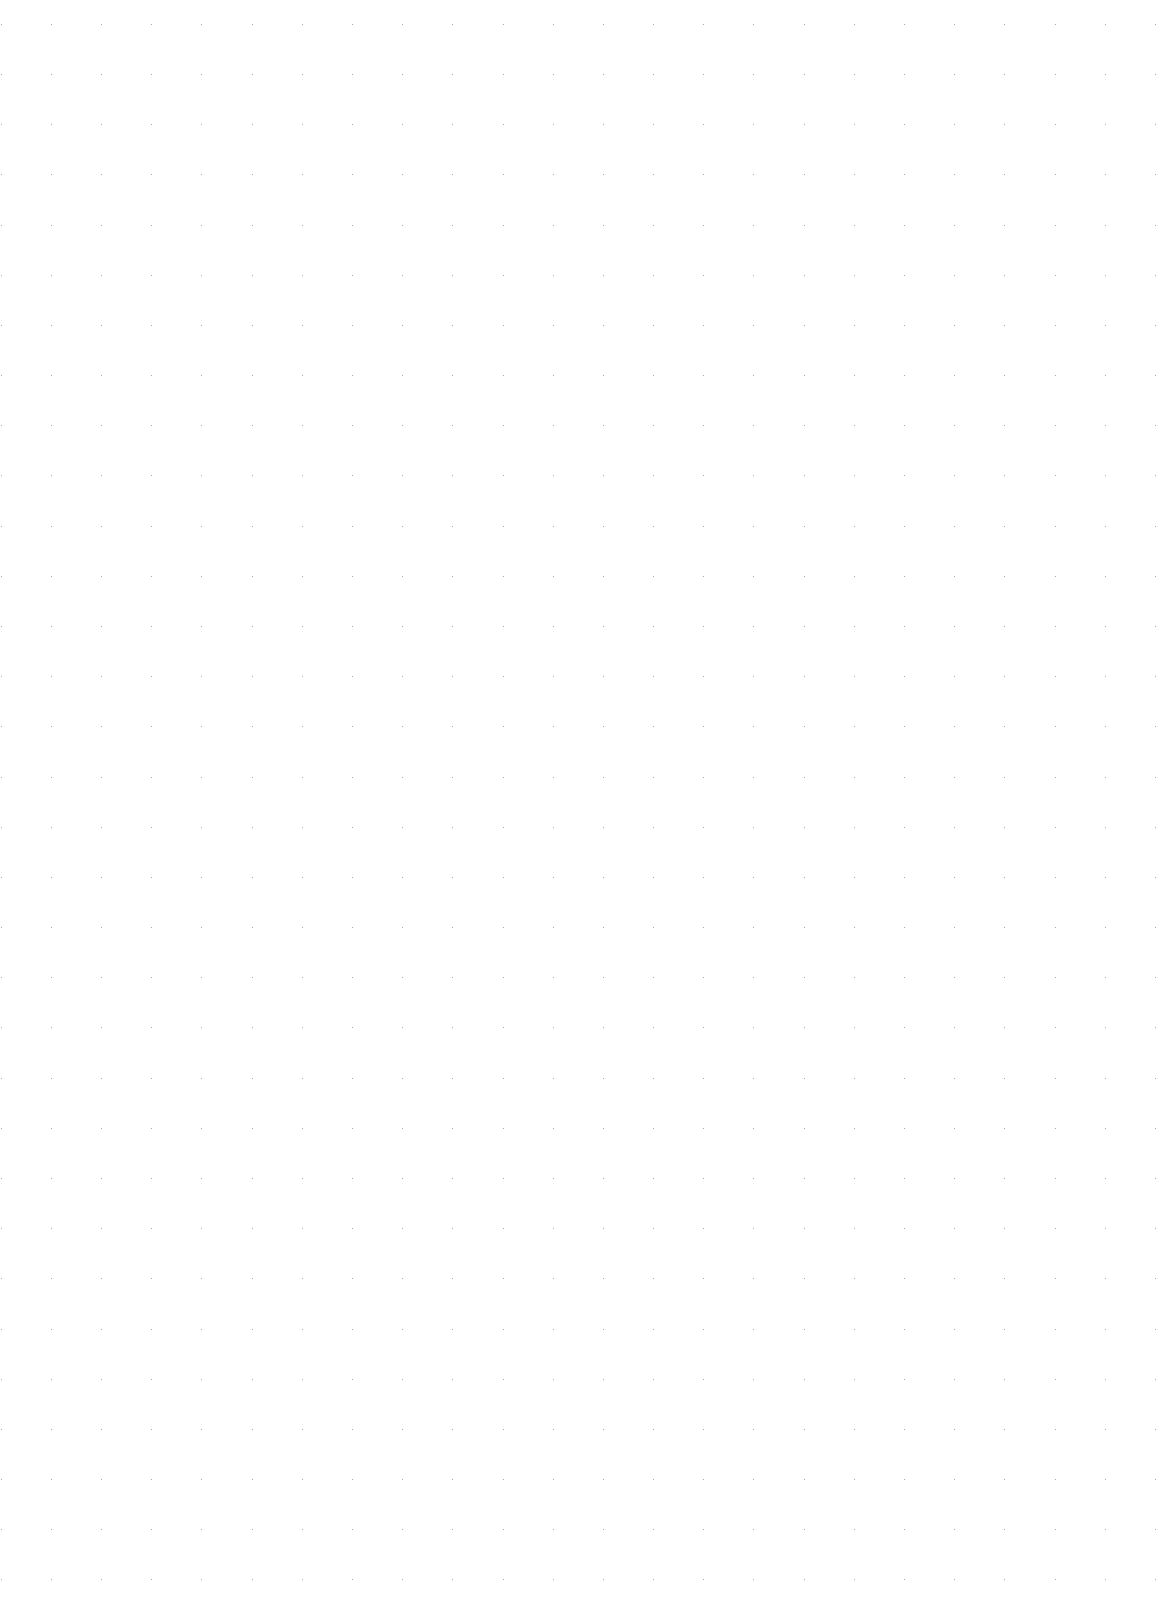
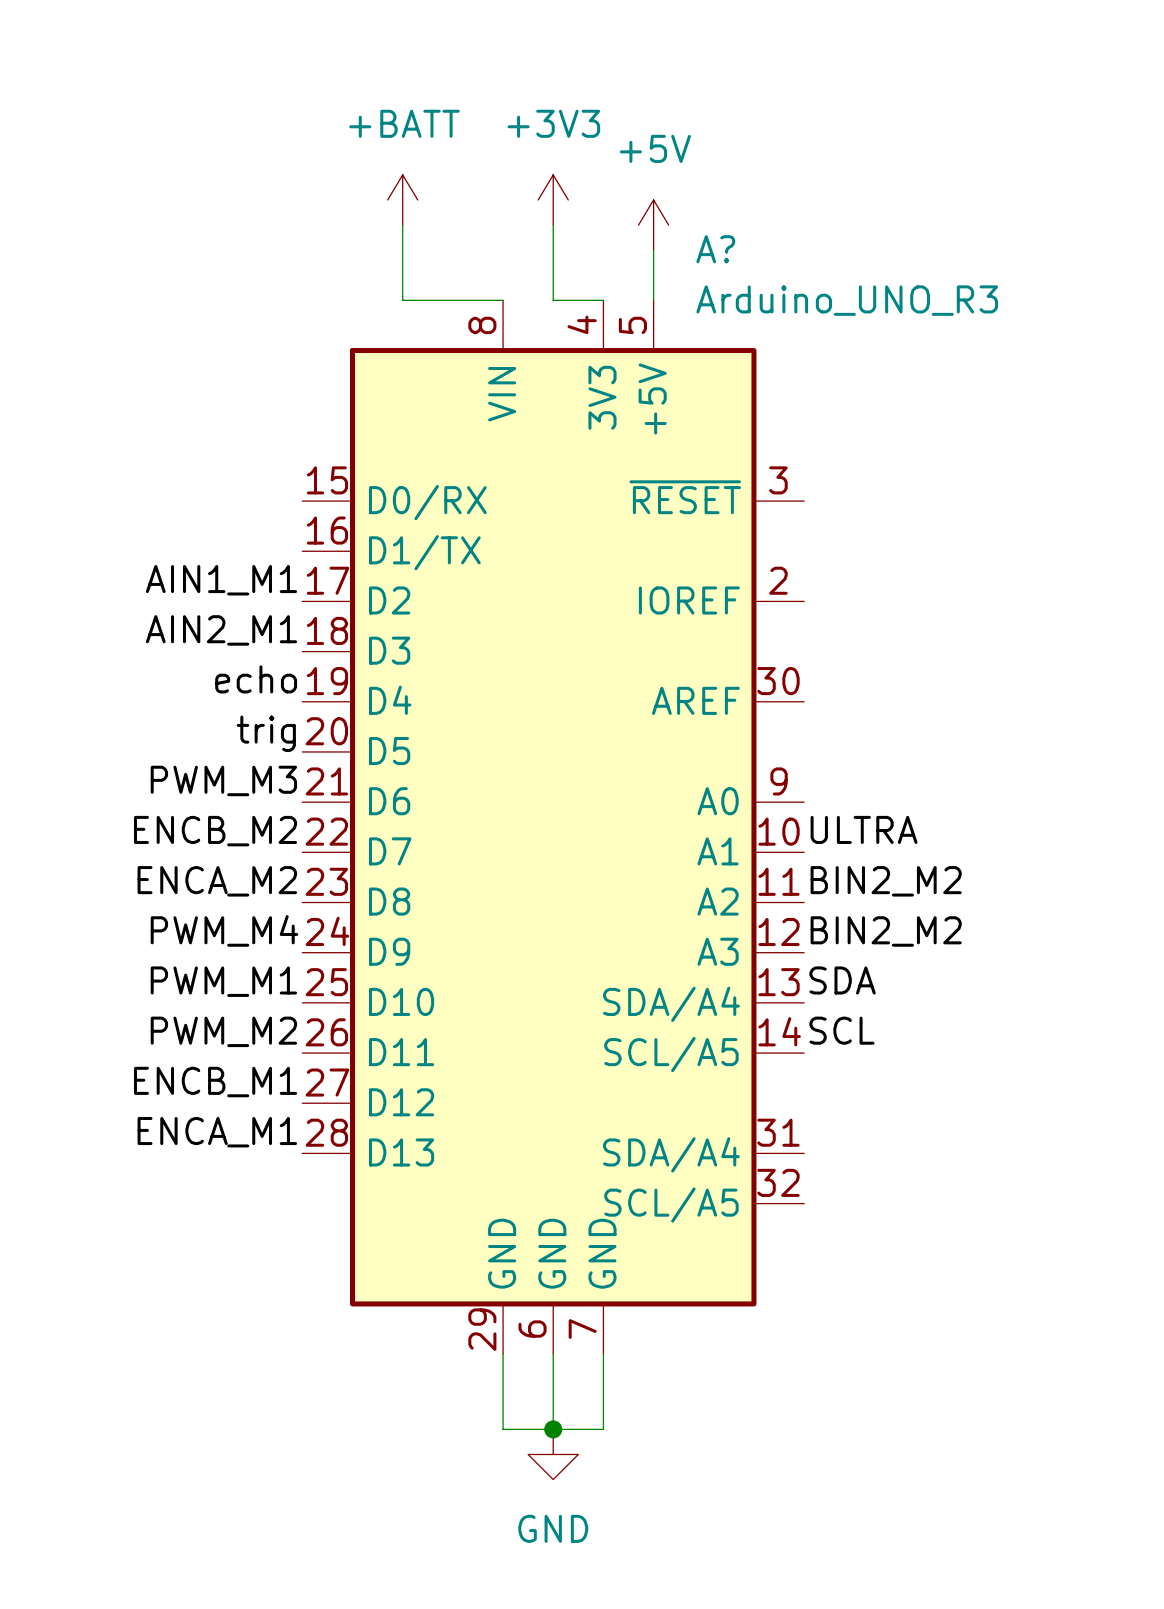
power symbol: none -> +BATT (402, 199)
power symbol: none -> +3V3 (553, 199)
wire: none -> (402, 225) (402, 300) (503, 300)
wire: none -> (553, 225) (553, 300) (603, 300)
power symbol: none -> +5V (653, 225)
wire: none -> (653, 250) (653, 300)
label: none -> AIN1_M1 (221, 580)
label: none -> AIN2_M1 (221, 630)
label: none -> echo (256, 679)
label: none -> trig (266, 733)
label: none -> PWM_M3 (223, 780)
A?: none -> Arduino_UNO_R3 (553, 827)
label: none -> ULTRA (864, 829)
label: none -> ENCB_M2 (215, 831)
label: none -> ENCA_M2 (217, 881)
label: none -> BIN2_M2 (886, 881)
label: none -> PWM_M4 (224, 930)
label: none -> BIN2_M2 (886, 931)
label: none -> SDA (842, 980)
label: none -> PWM_M1 (223, 981)
label: none -> SCL (841, 1030)
label: none -> PWM_M2 (223, 1031)
label: none -> ENCB_M1 (215, 1082)
label: none -> ENCA_M1 (217, 1132)
wire: none -> (503, 1354) (503, 1429) (603, 1429) (603, 1354)
wire: none -> (553, 1354) (553, 1429)
junction: none -> (553, 1429)
power symbol: none -> GND (553, 1454)

